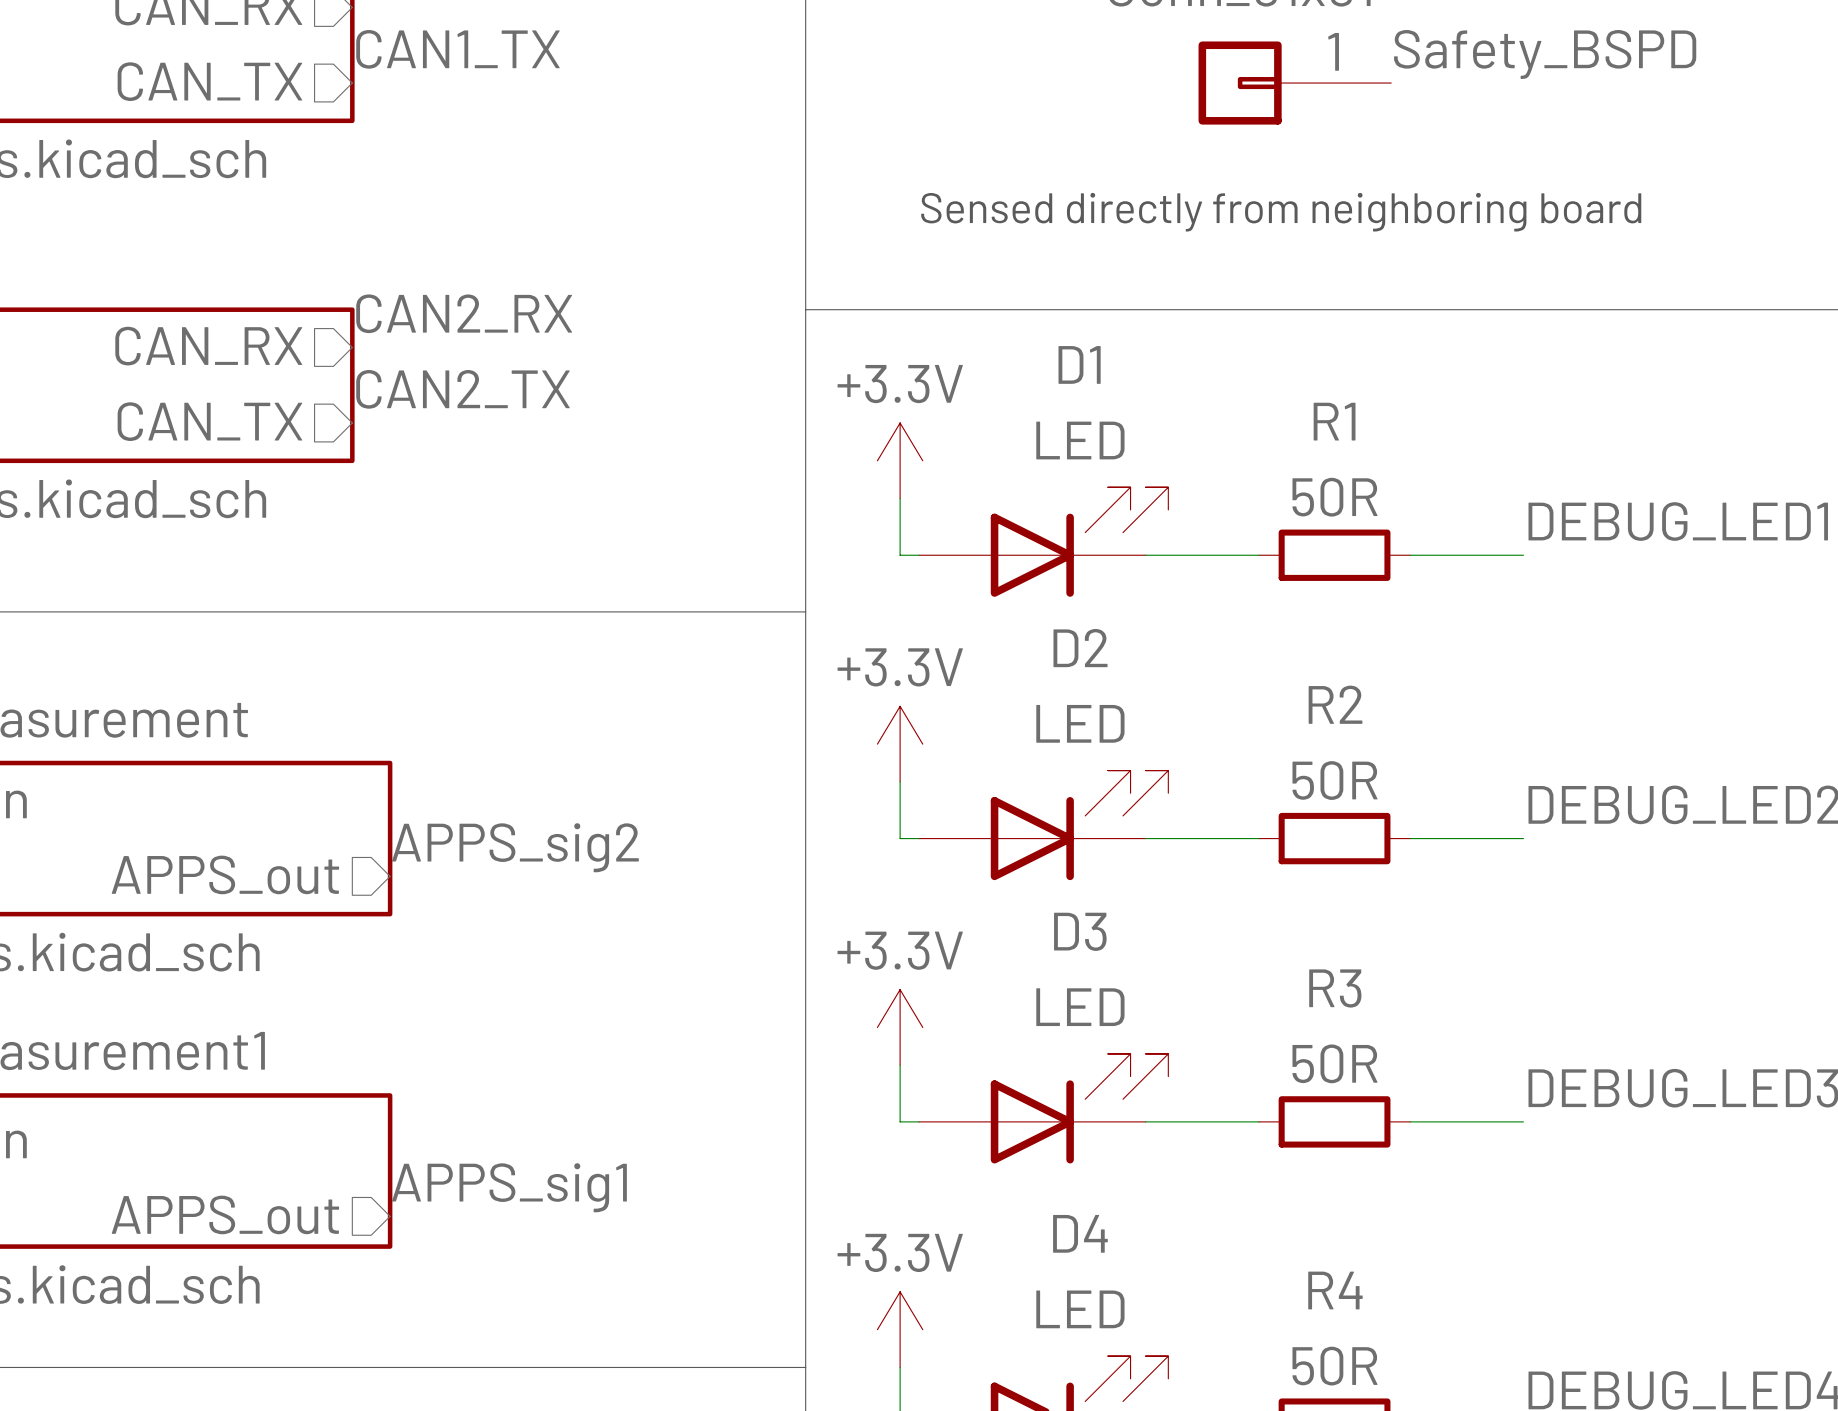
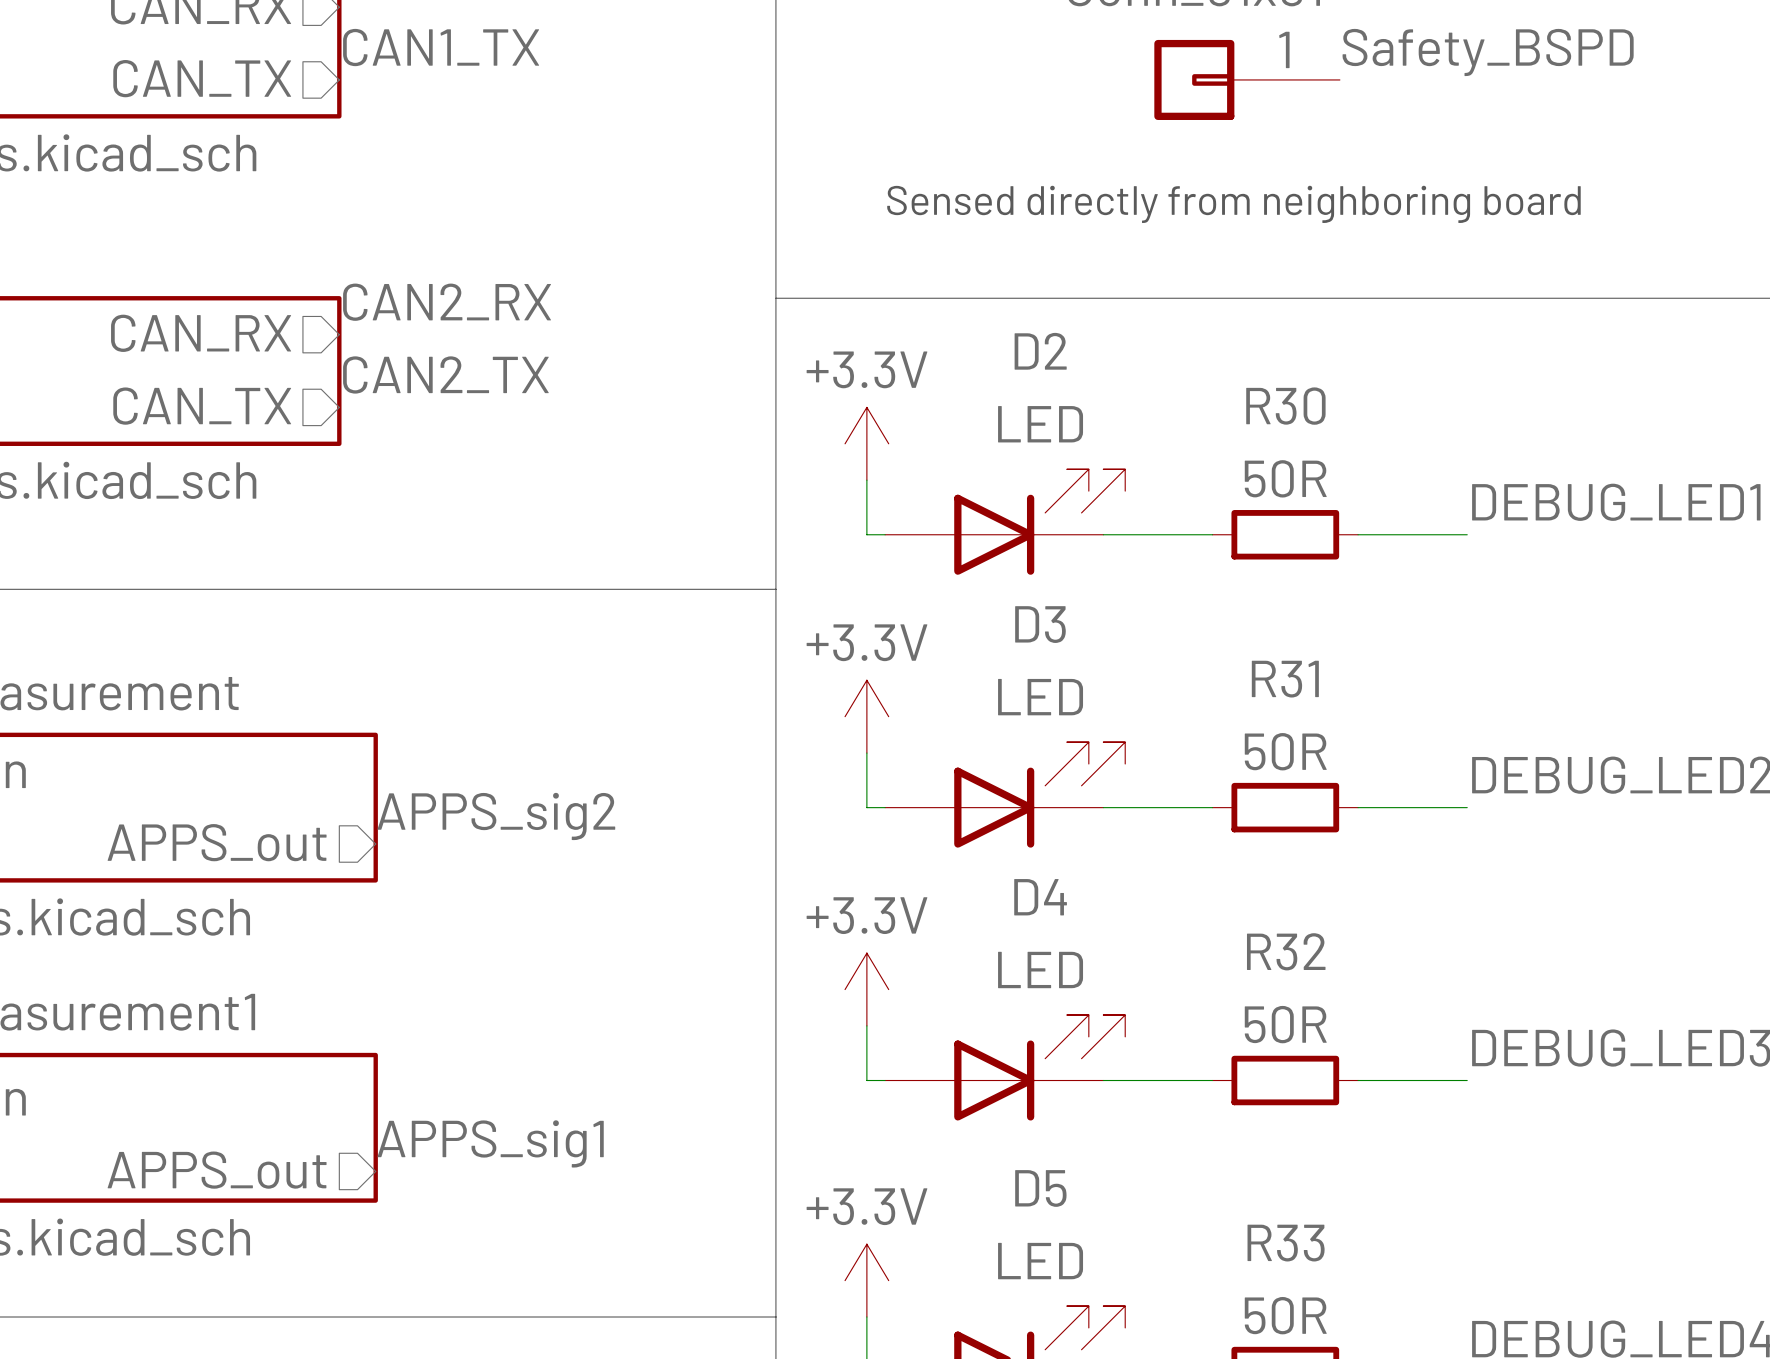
D1 name: D1 (1079, 364) -> D2 (1040, 351)
R1 name: R1 (1334, 421) -> R30 (1285, 406)
D2 name: D2 (1080, 648) -> D3 (1040, 624)
R2 name: R2 (1335, 704) -> R31 (1285, 679)
D3 name: D3 (1080, 931) -> D4 (1040, 897)
R3 name: R3 (1335, 988) -> R32 (1286, 951)
D4 name: D4 (1080, 1233) -> D5 (1040, 1188)
R4 name: R4 (1335, 1290) -> R33 (1286, 1243)

